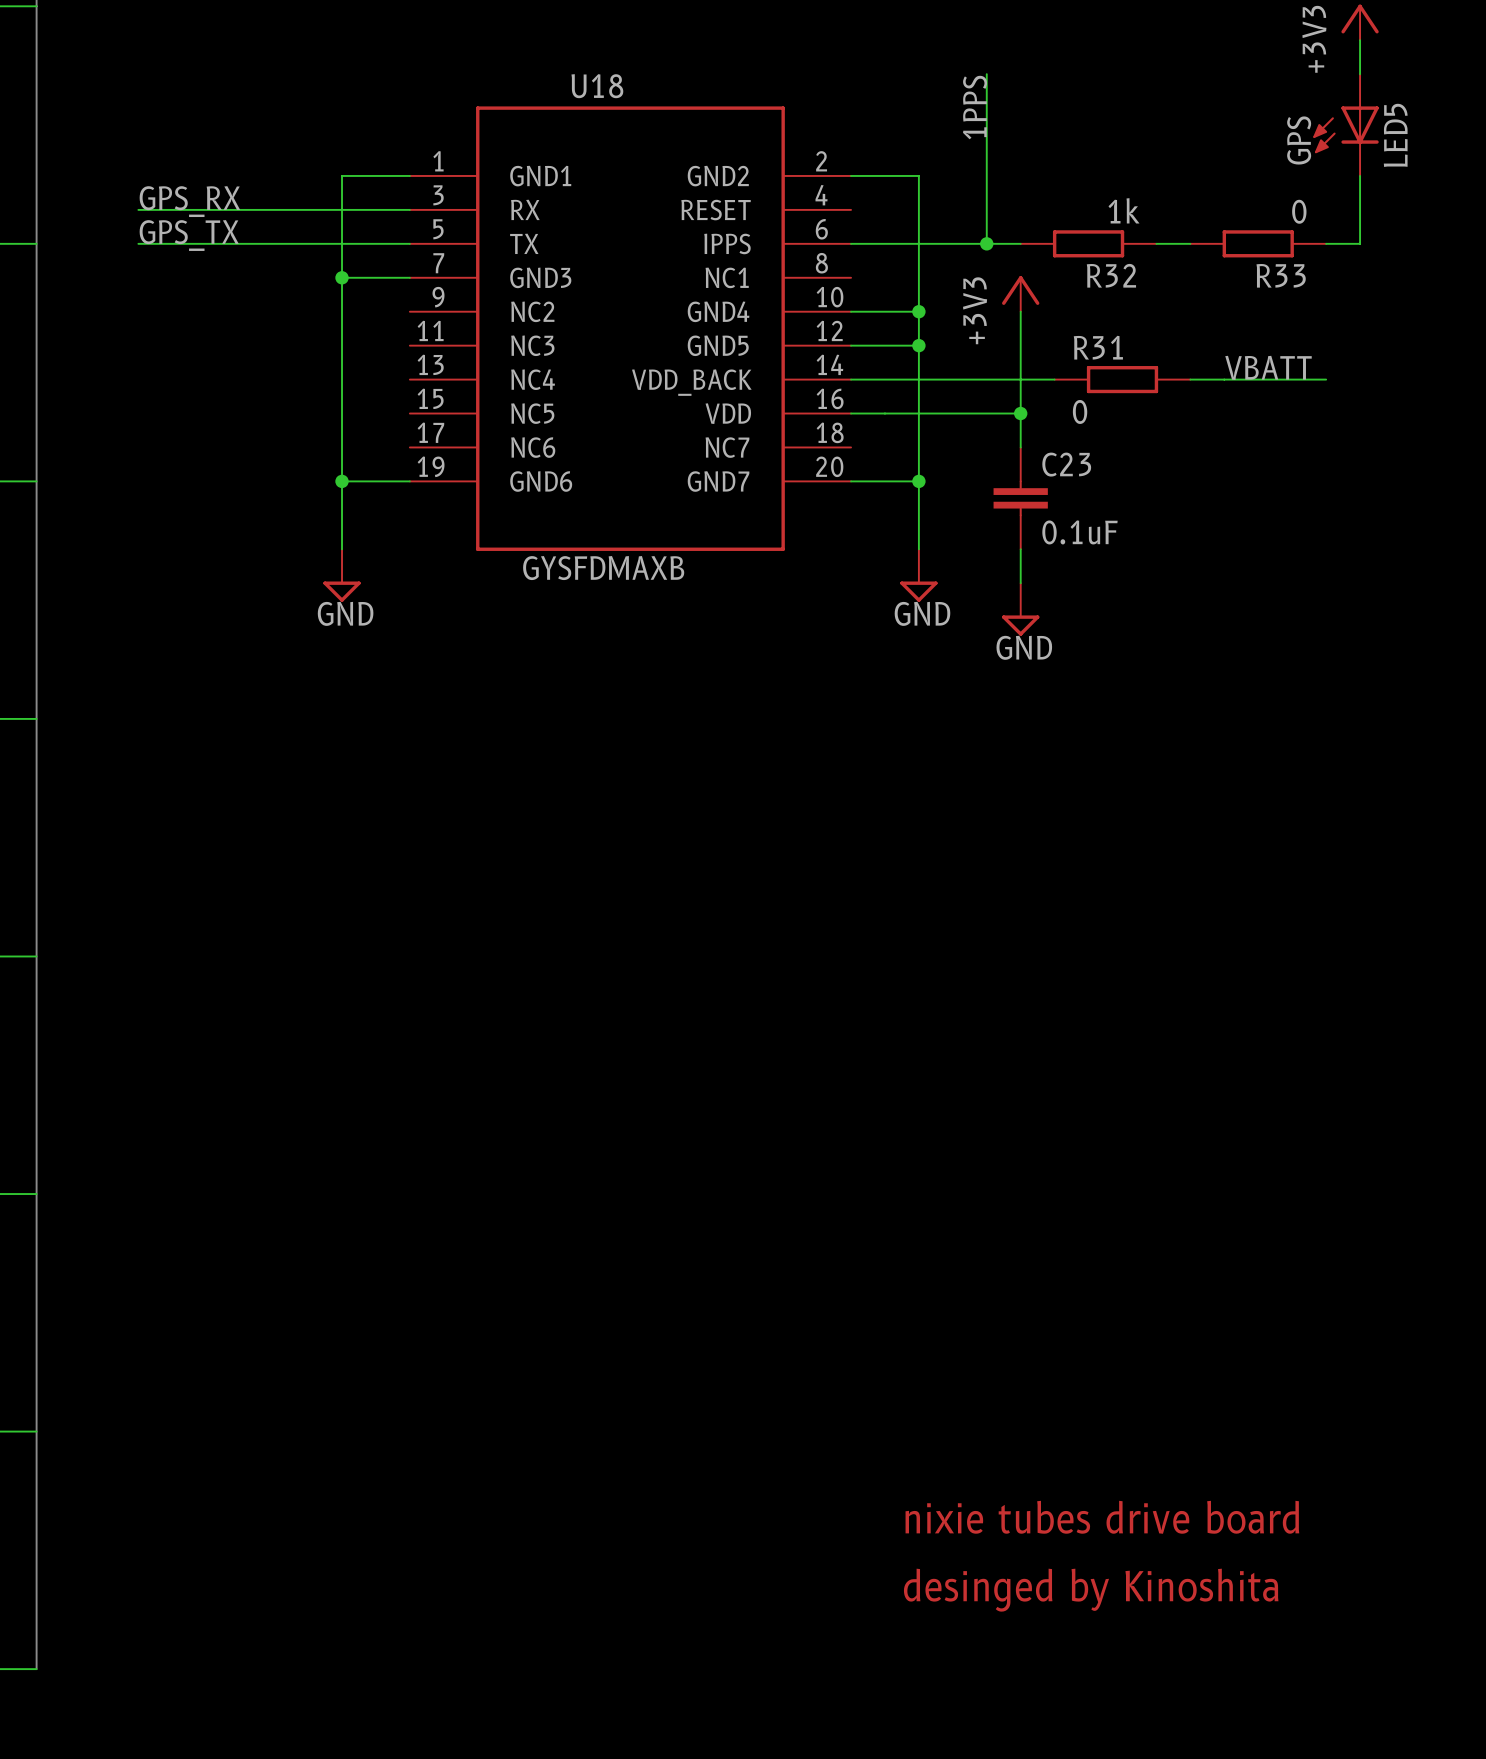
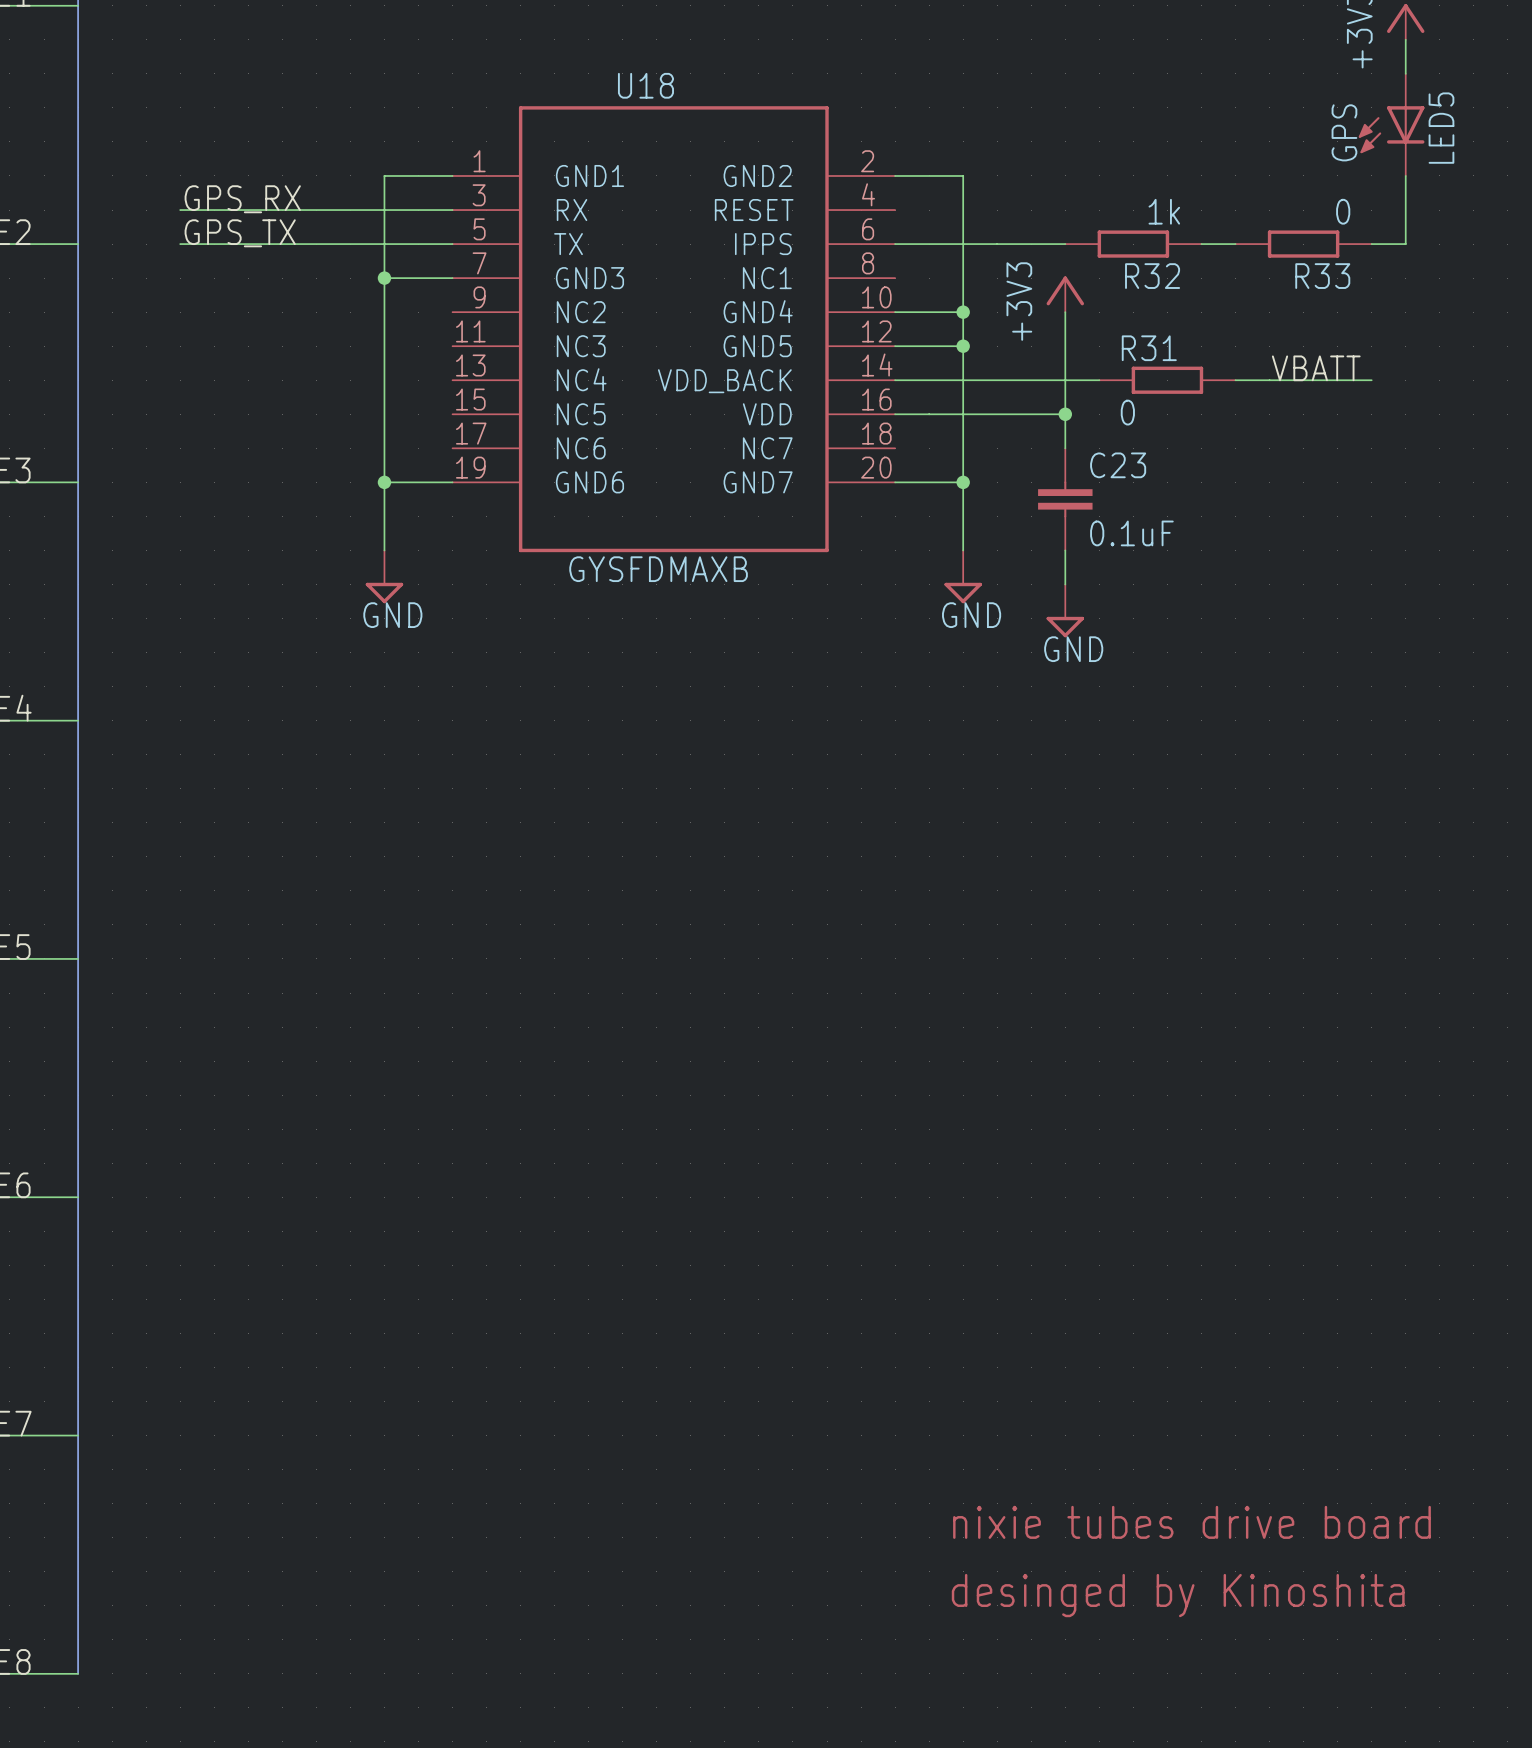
wire: (986, 74) (986, 243) -> none
label: 1PPS (975, 107) -> none
junction: (986, 243) -> none

